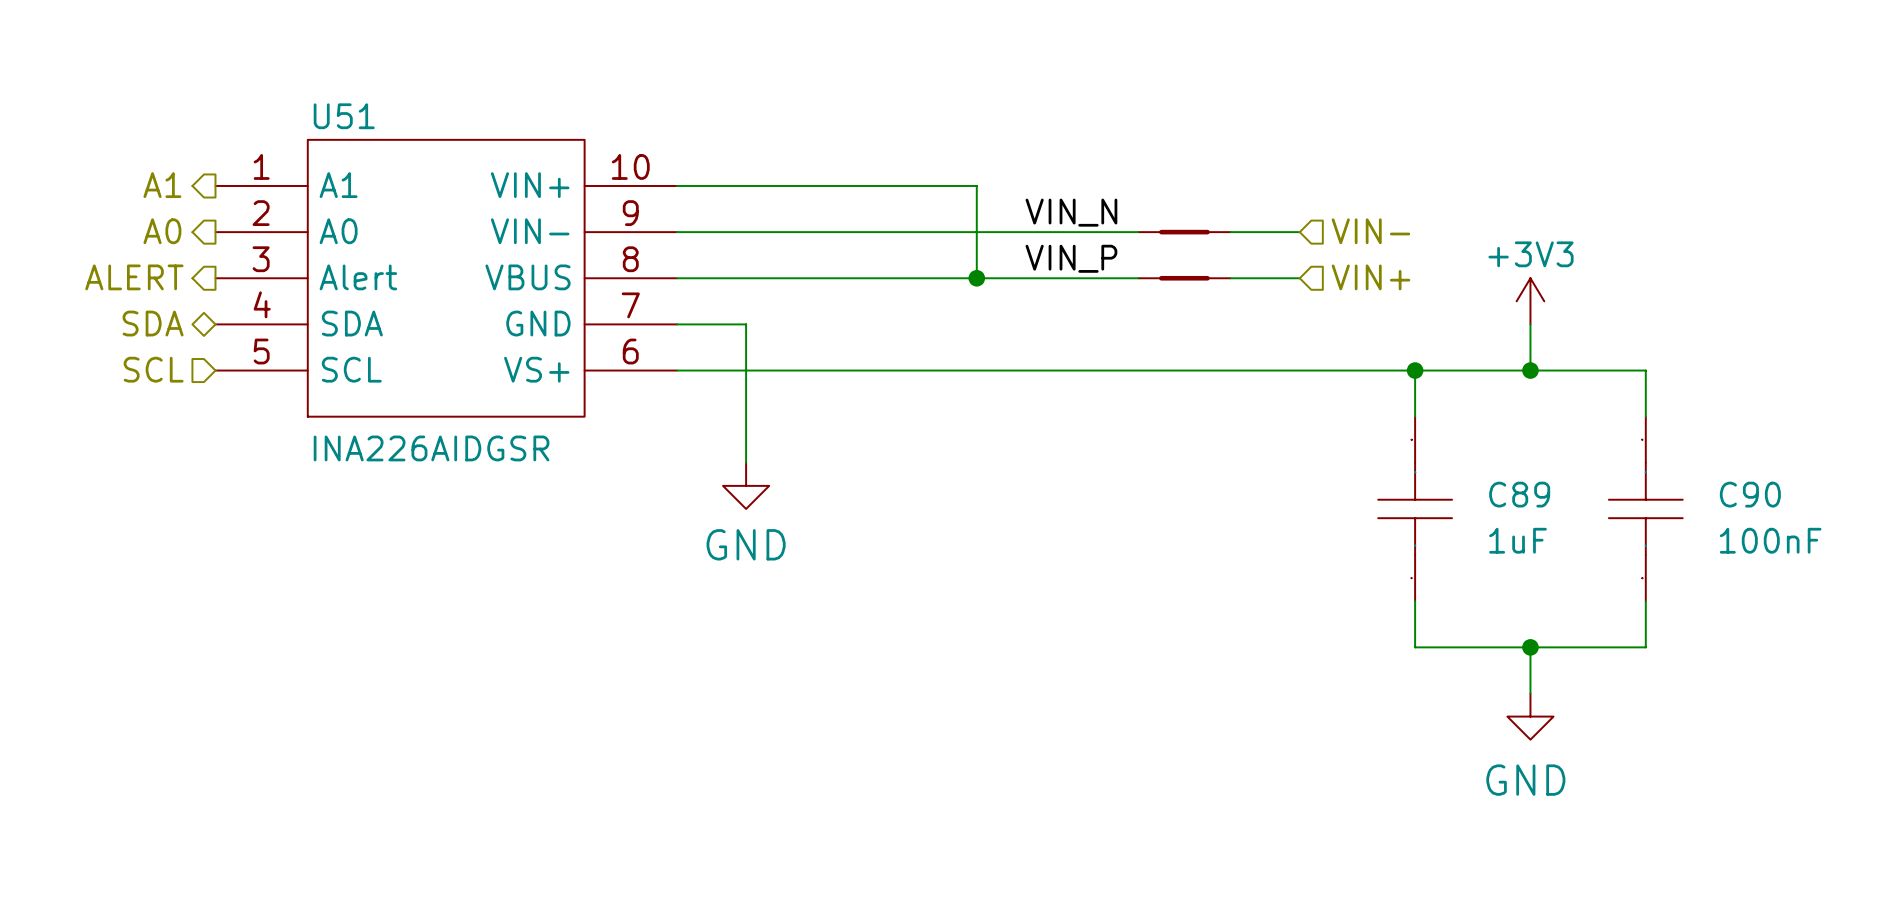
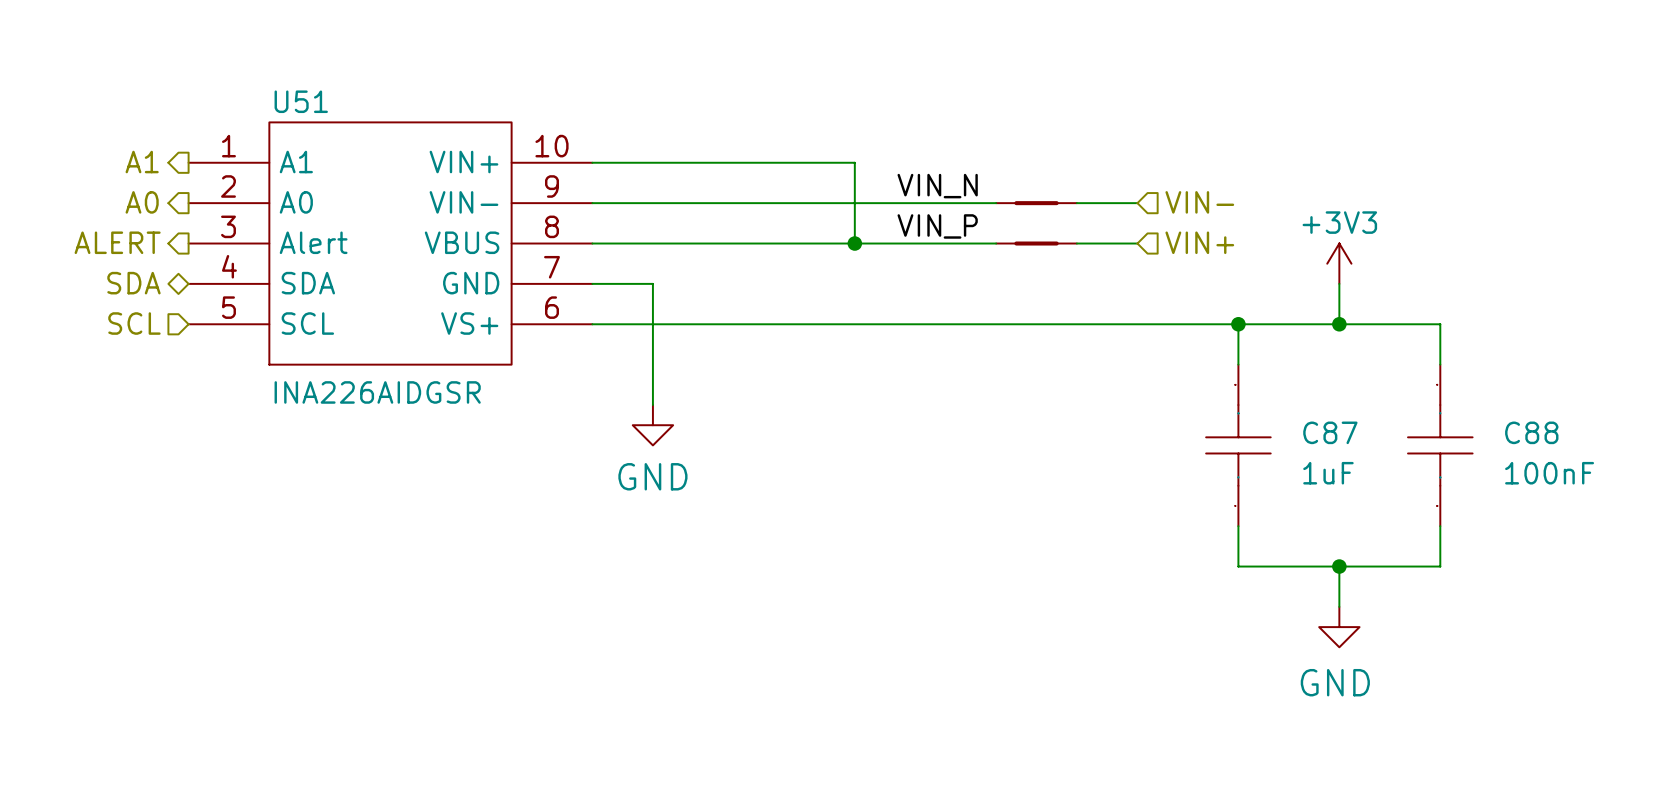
C89 name: C89 (1519, 494) -> C87 (1330, 432)
C90 name: C90 (1750, 494) -> C88 (1531, 432)

